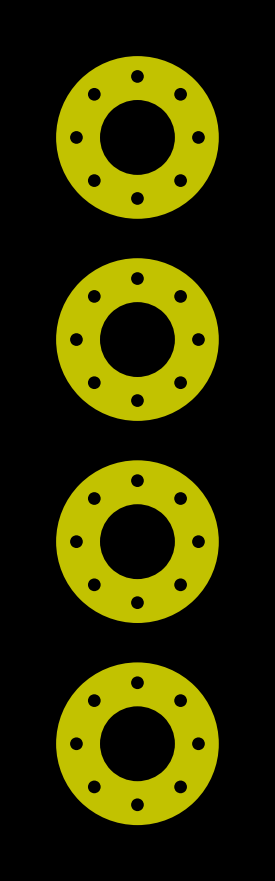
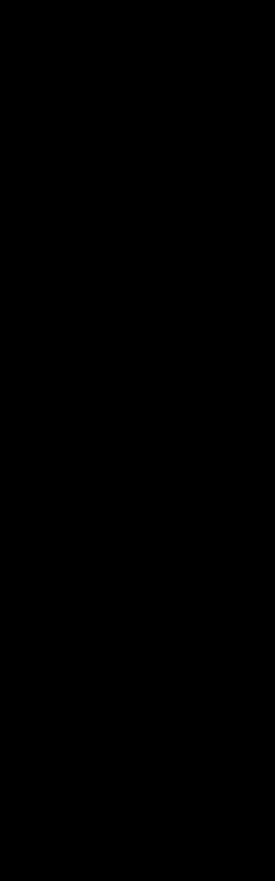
part: (137, 137) -> none
part: (137, 339) -> none
part: (137, 541) -> none
part: (137, 743) -> none

